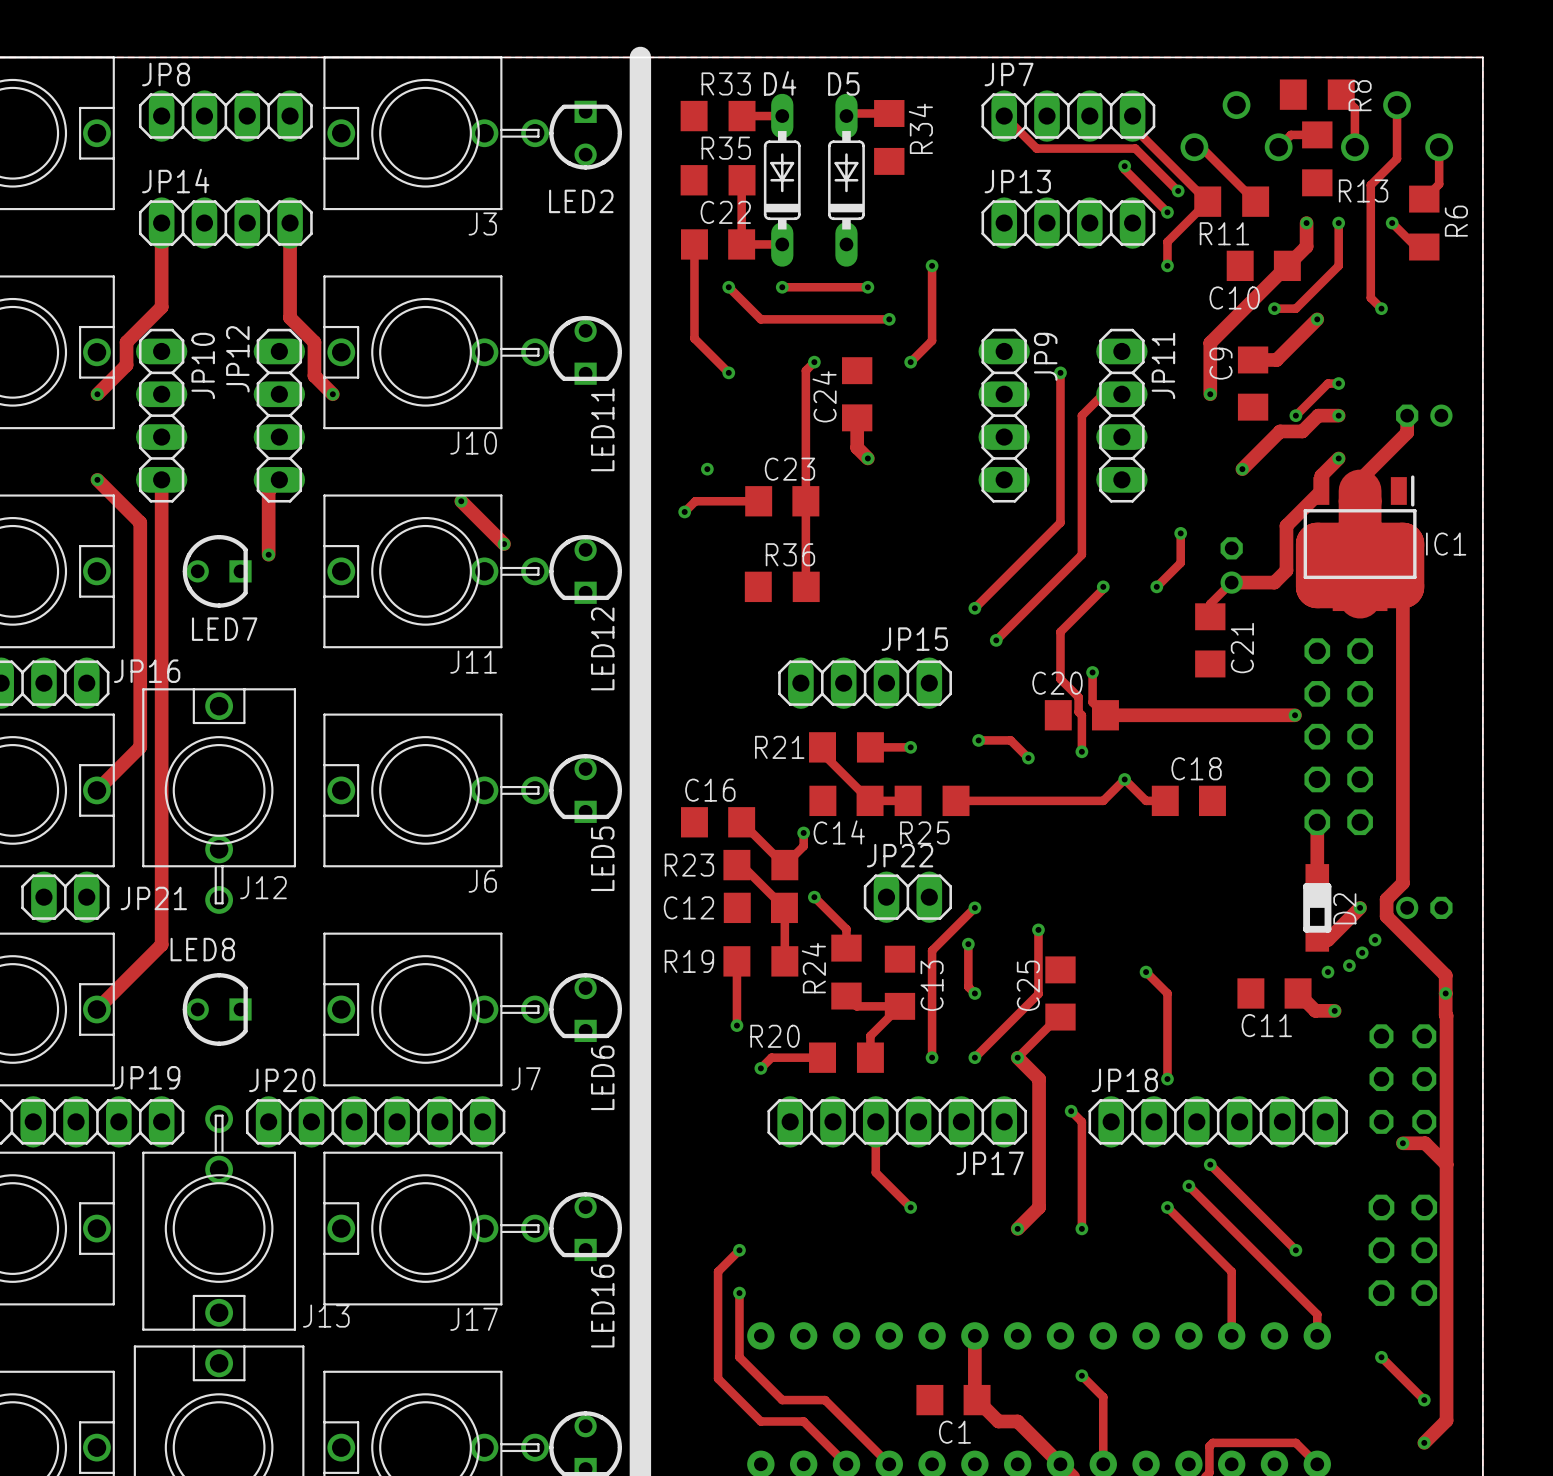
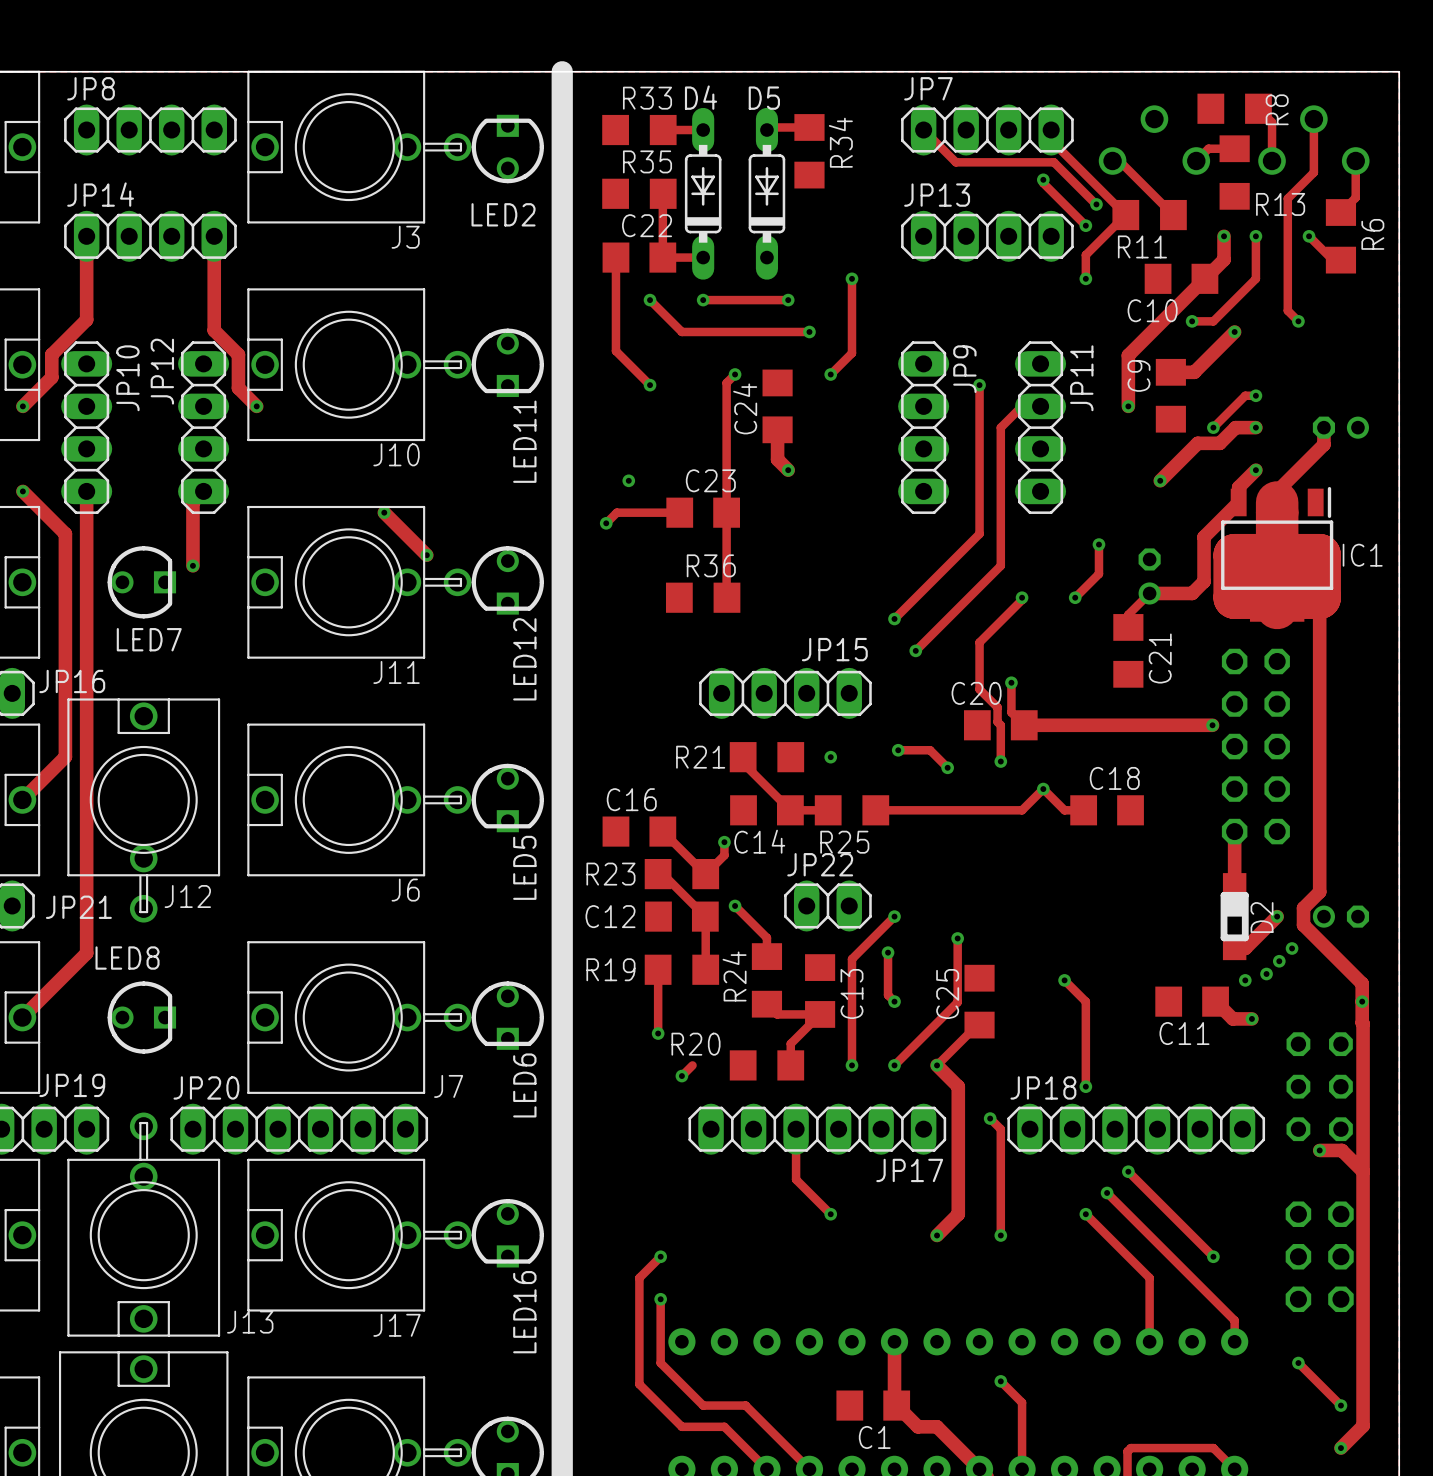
track: (870, 747) (910, 747) -> none
track: (771, 1057) (822, 1057) -> none

